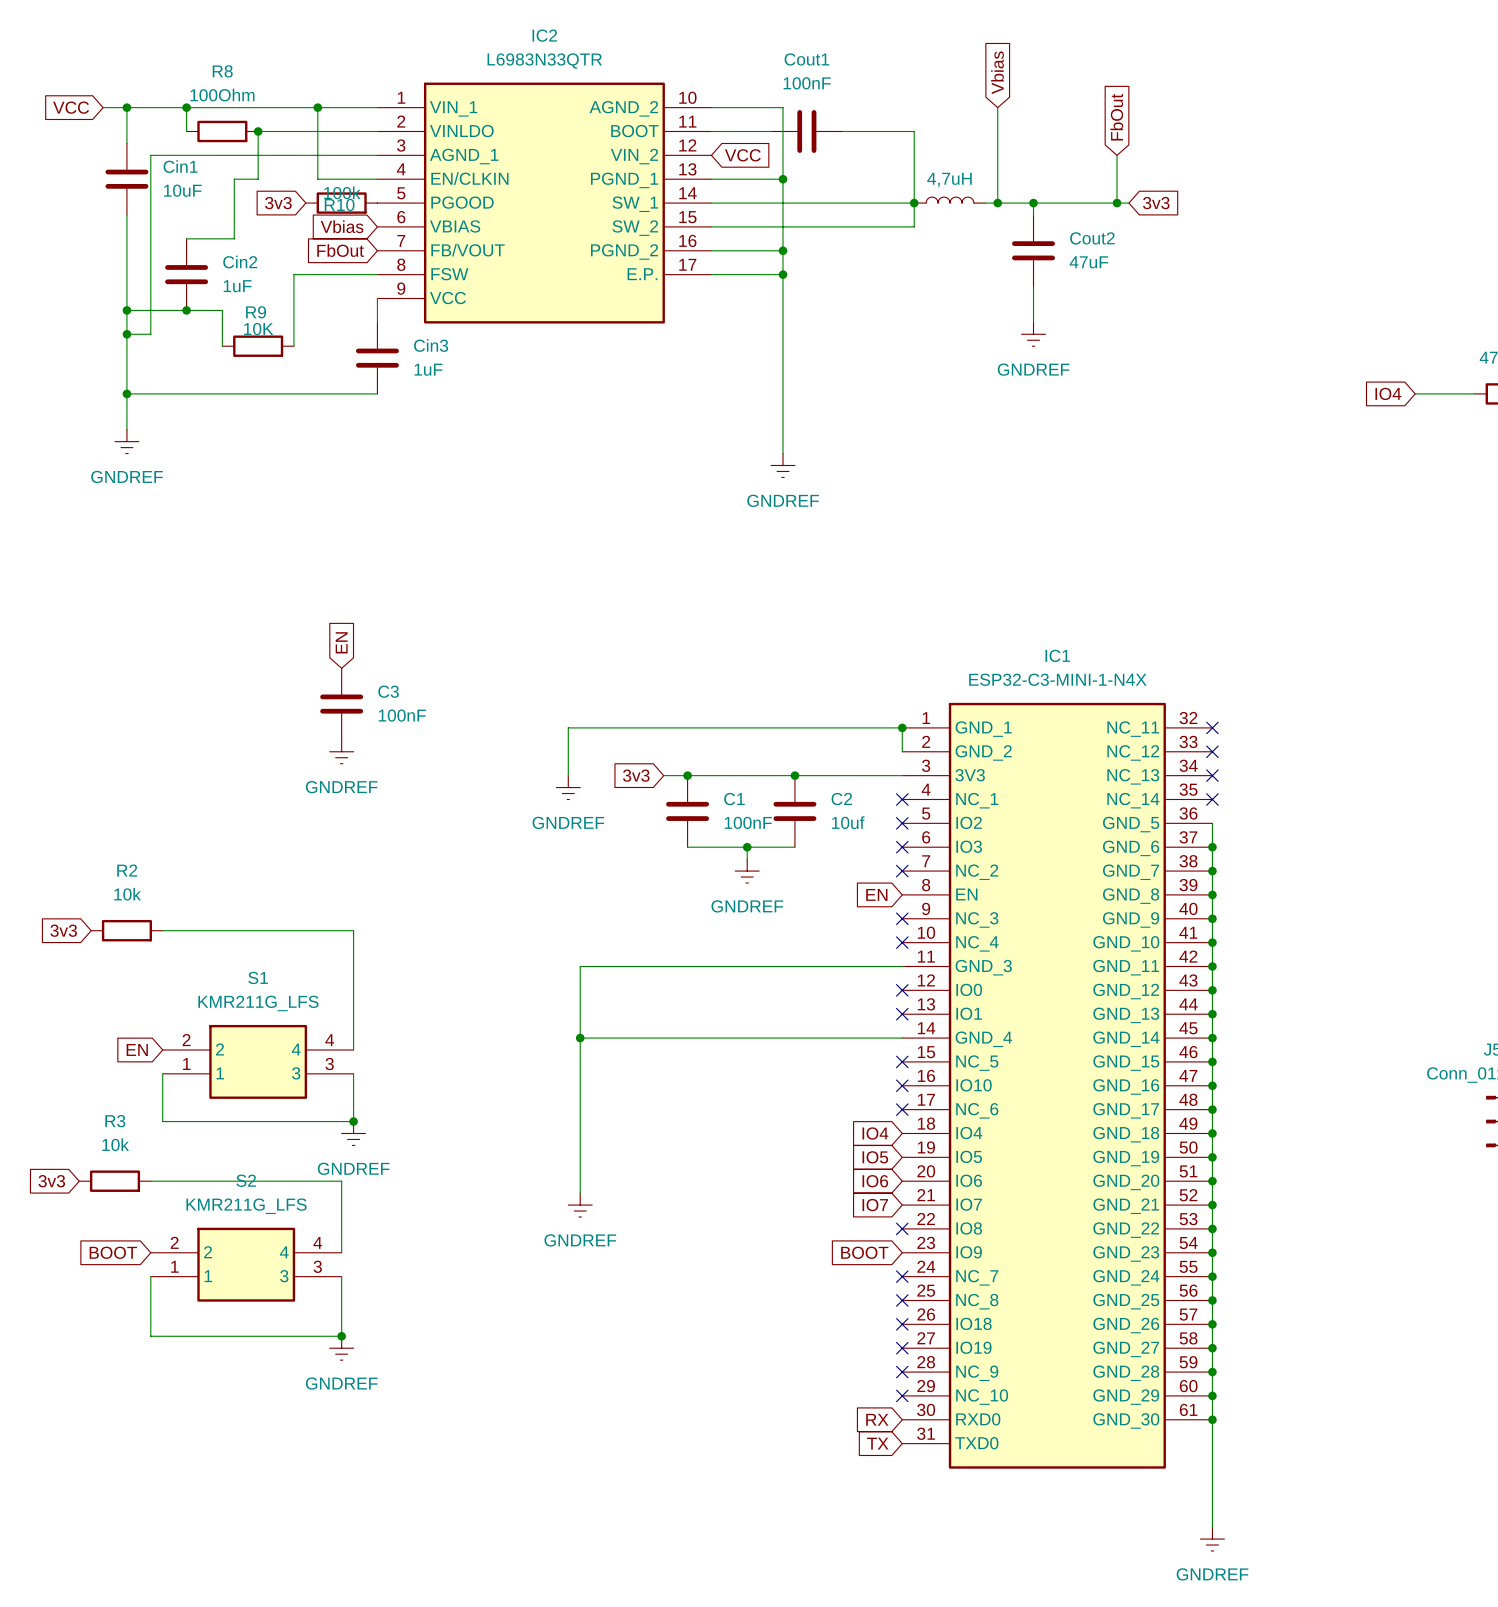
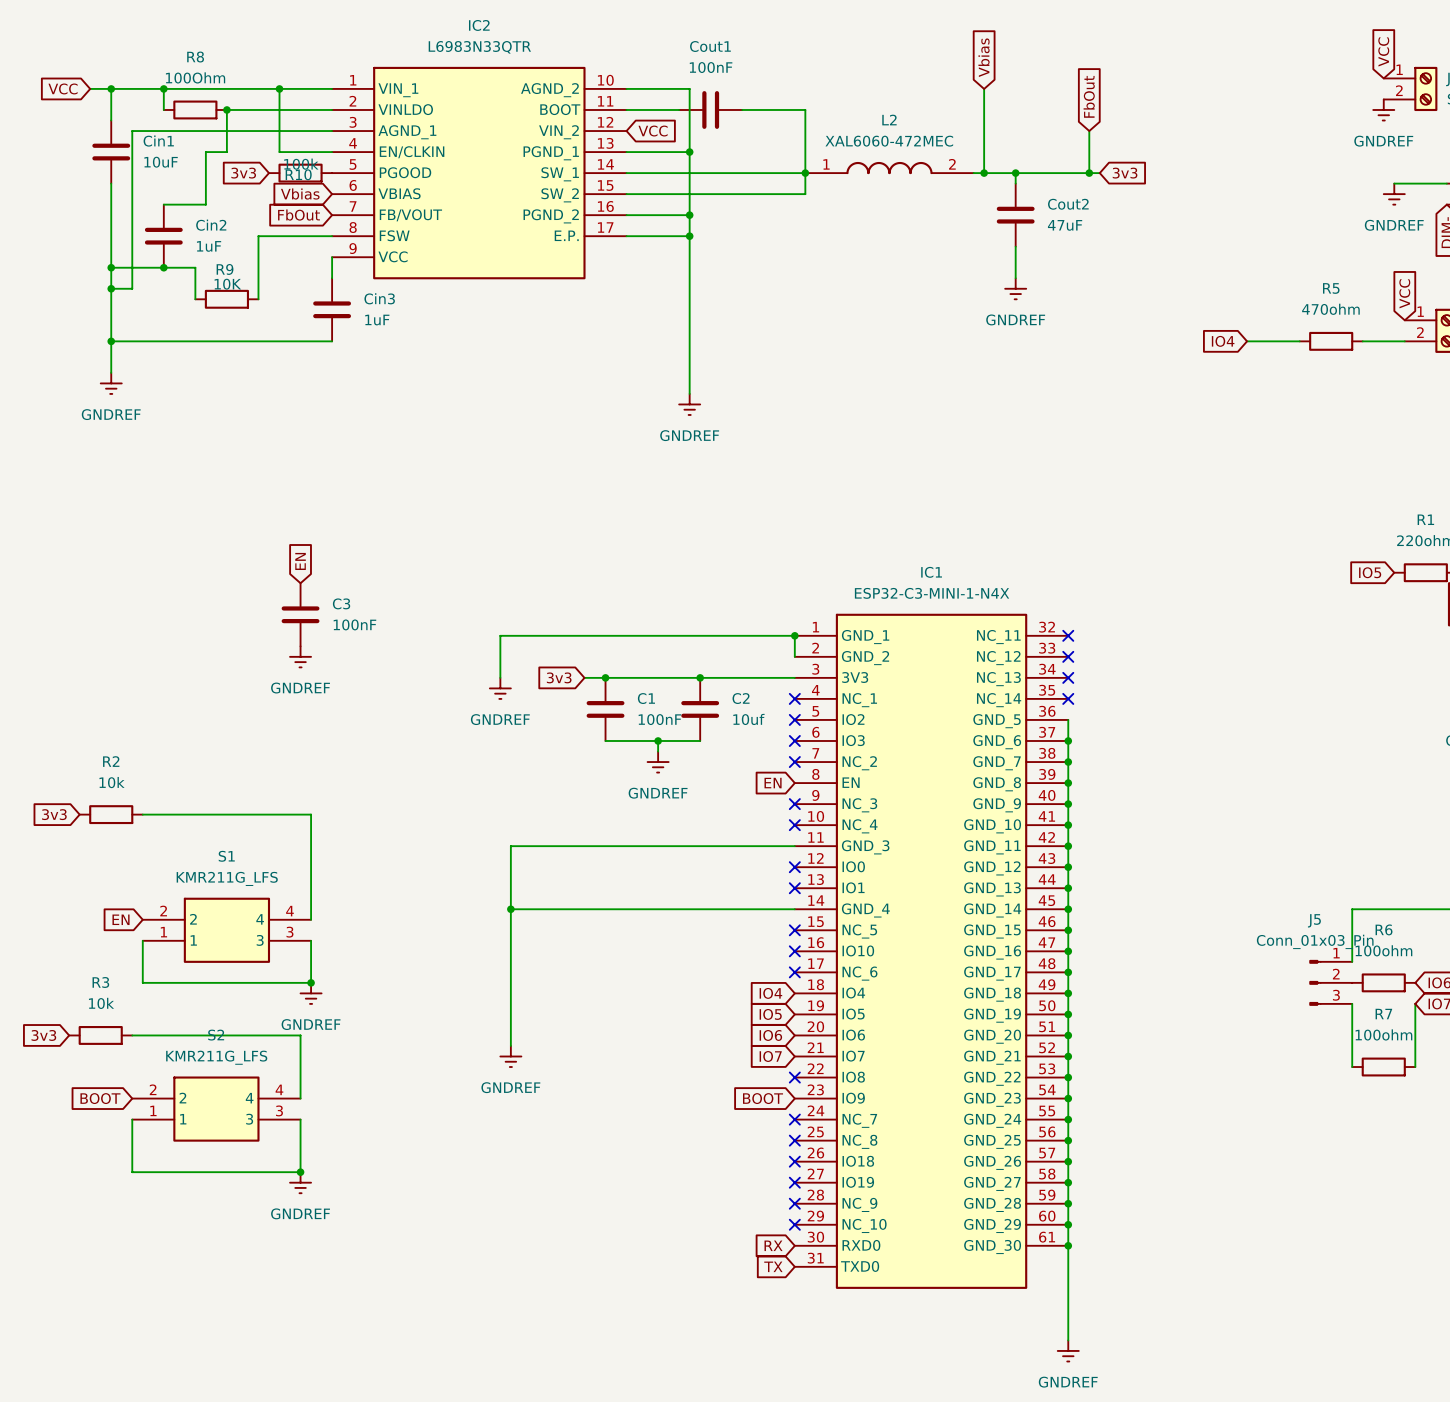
global label position: Vbias (997, 72) -> Vbias (984, 57)
wire: (997, 107) (997, 203) -> none
wire: none -> (984, 88) (984, 131)
global label position: FbOut (1116, 117) -> FbOut (1089, 96)
wire: none -> (1089, 131) (1089, 173)
L2: none -> XAL6060-472MEC (889, 168)
part: 4,7uH (950, 200) -> none
wire: (985, 203) (1105, 203) -> (994, 173) (1099, 173)
junction: (997, 203) -> none
wire: (1033, 203) (1033, 214) -> (1015, 173) (1015, 183)
junction: (1033, 203) -> none
junction: none -> (1015, 173)
global label position: 3v3 (1156, 203) -> 3v3 (1125, 173)
junction: none -> (1089, 173)
Cout2 position: (1033, 250) -> (1015, 215)
wire: (1033, 286) (1033, 322) -> (1015, 246) (1015, 278)
power symbol position: GNDREF (1033, 334) -> GNDREF (1015, 288)

